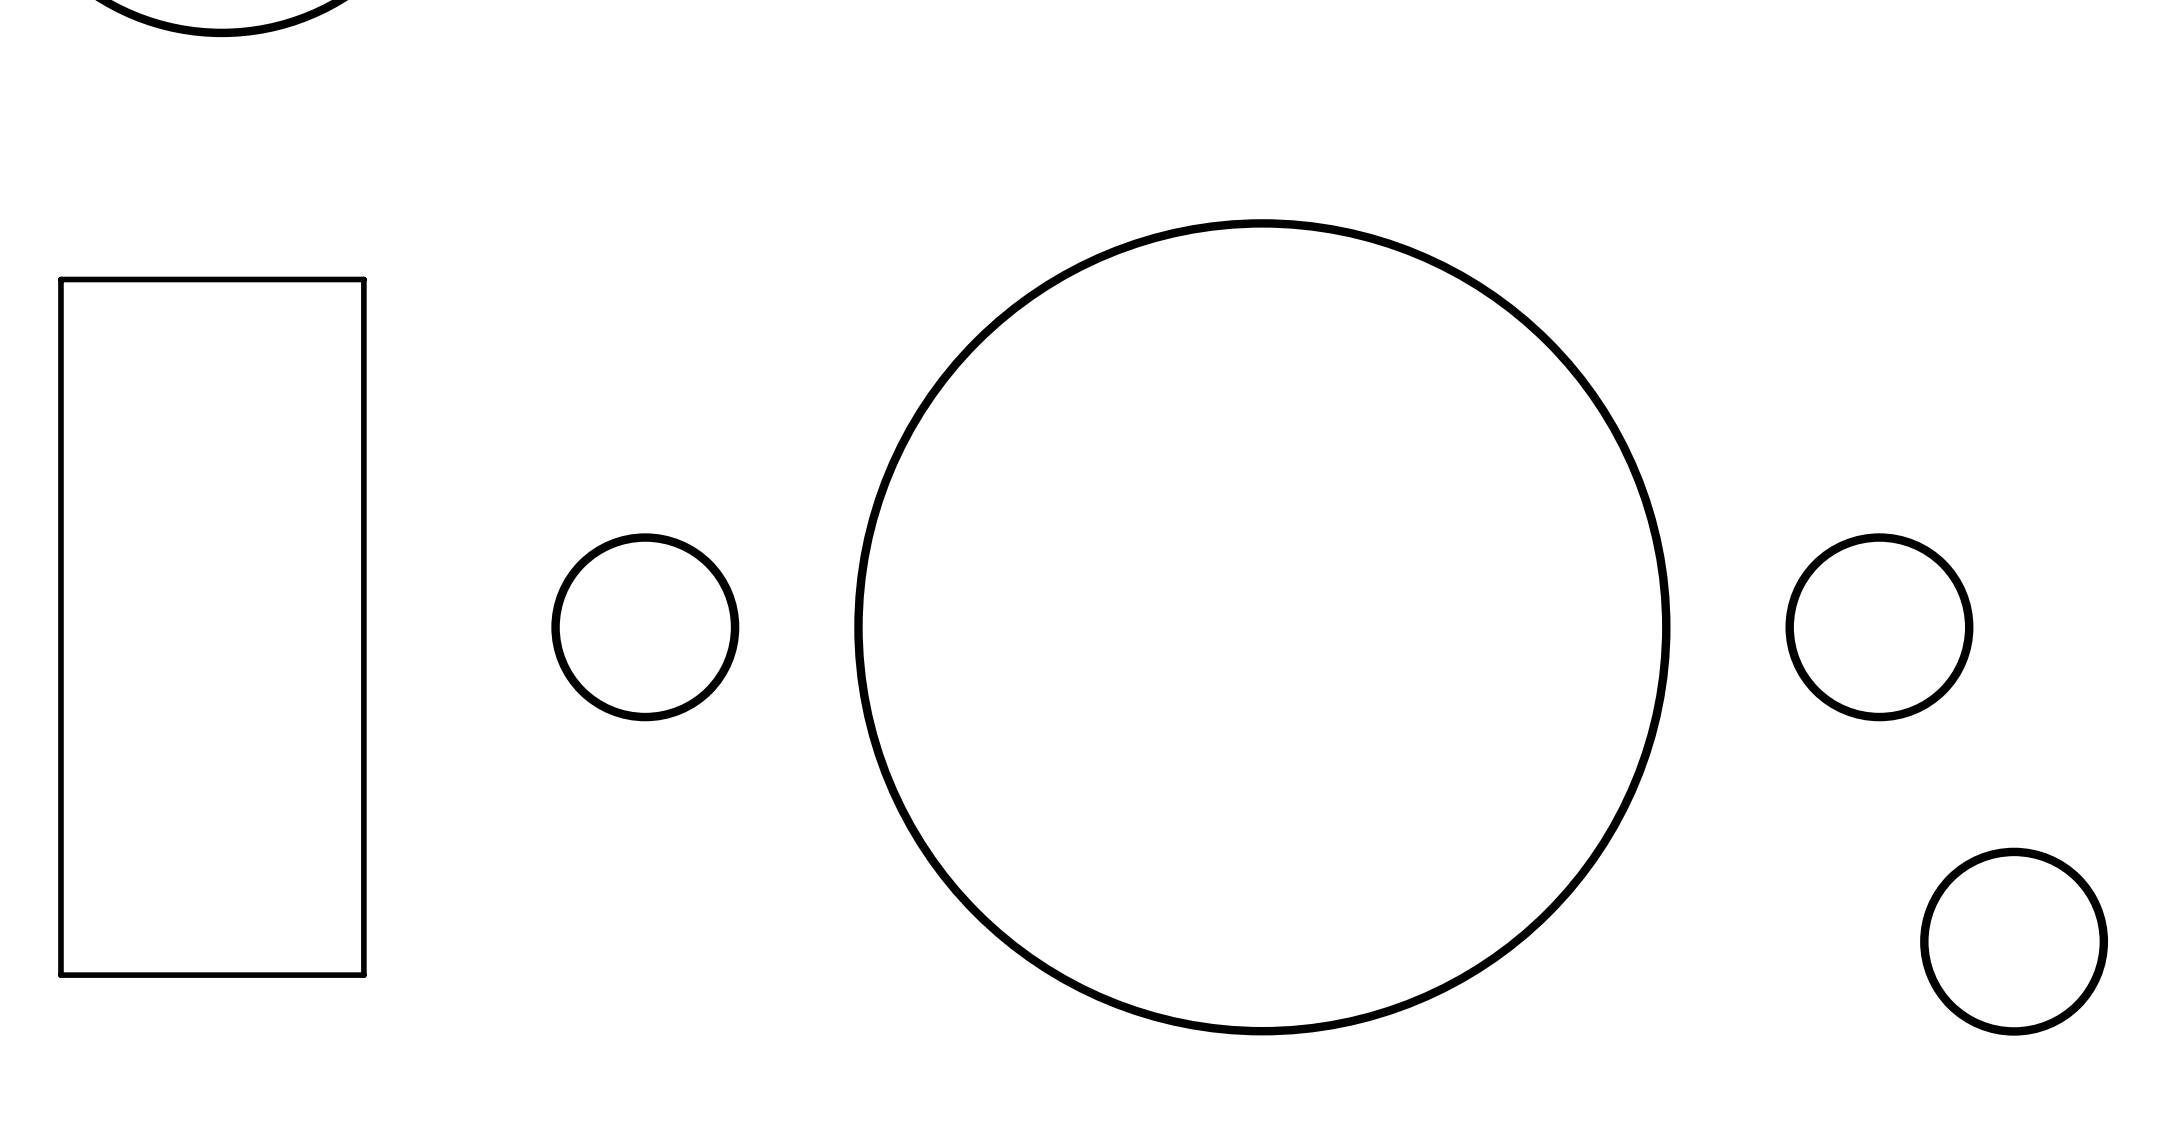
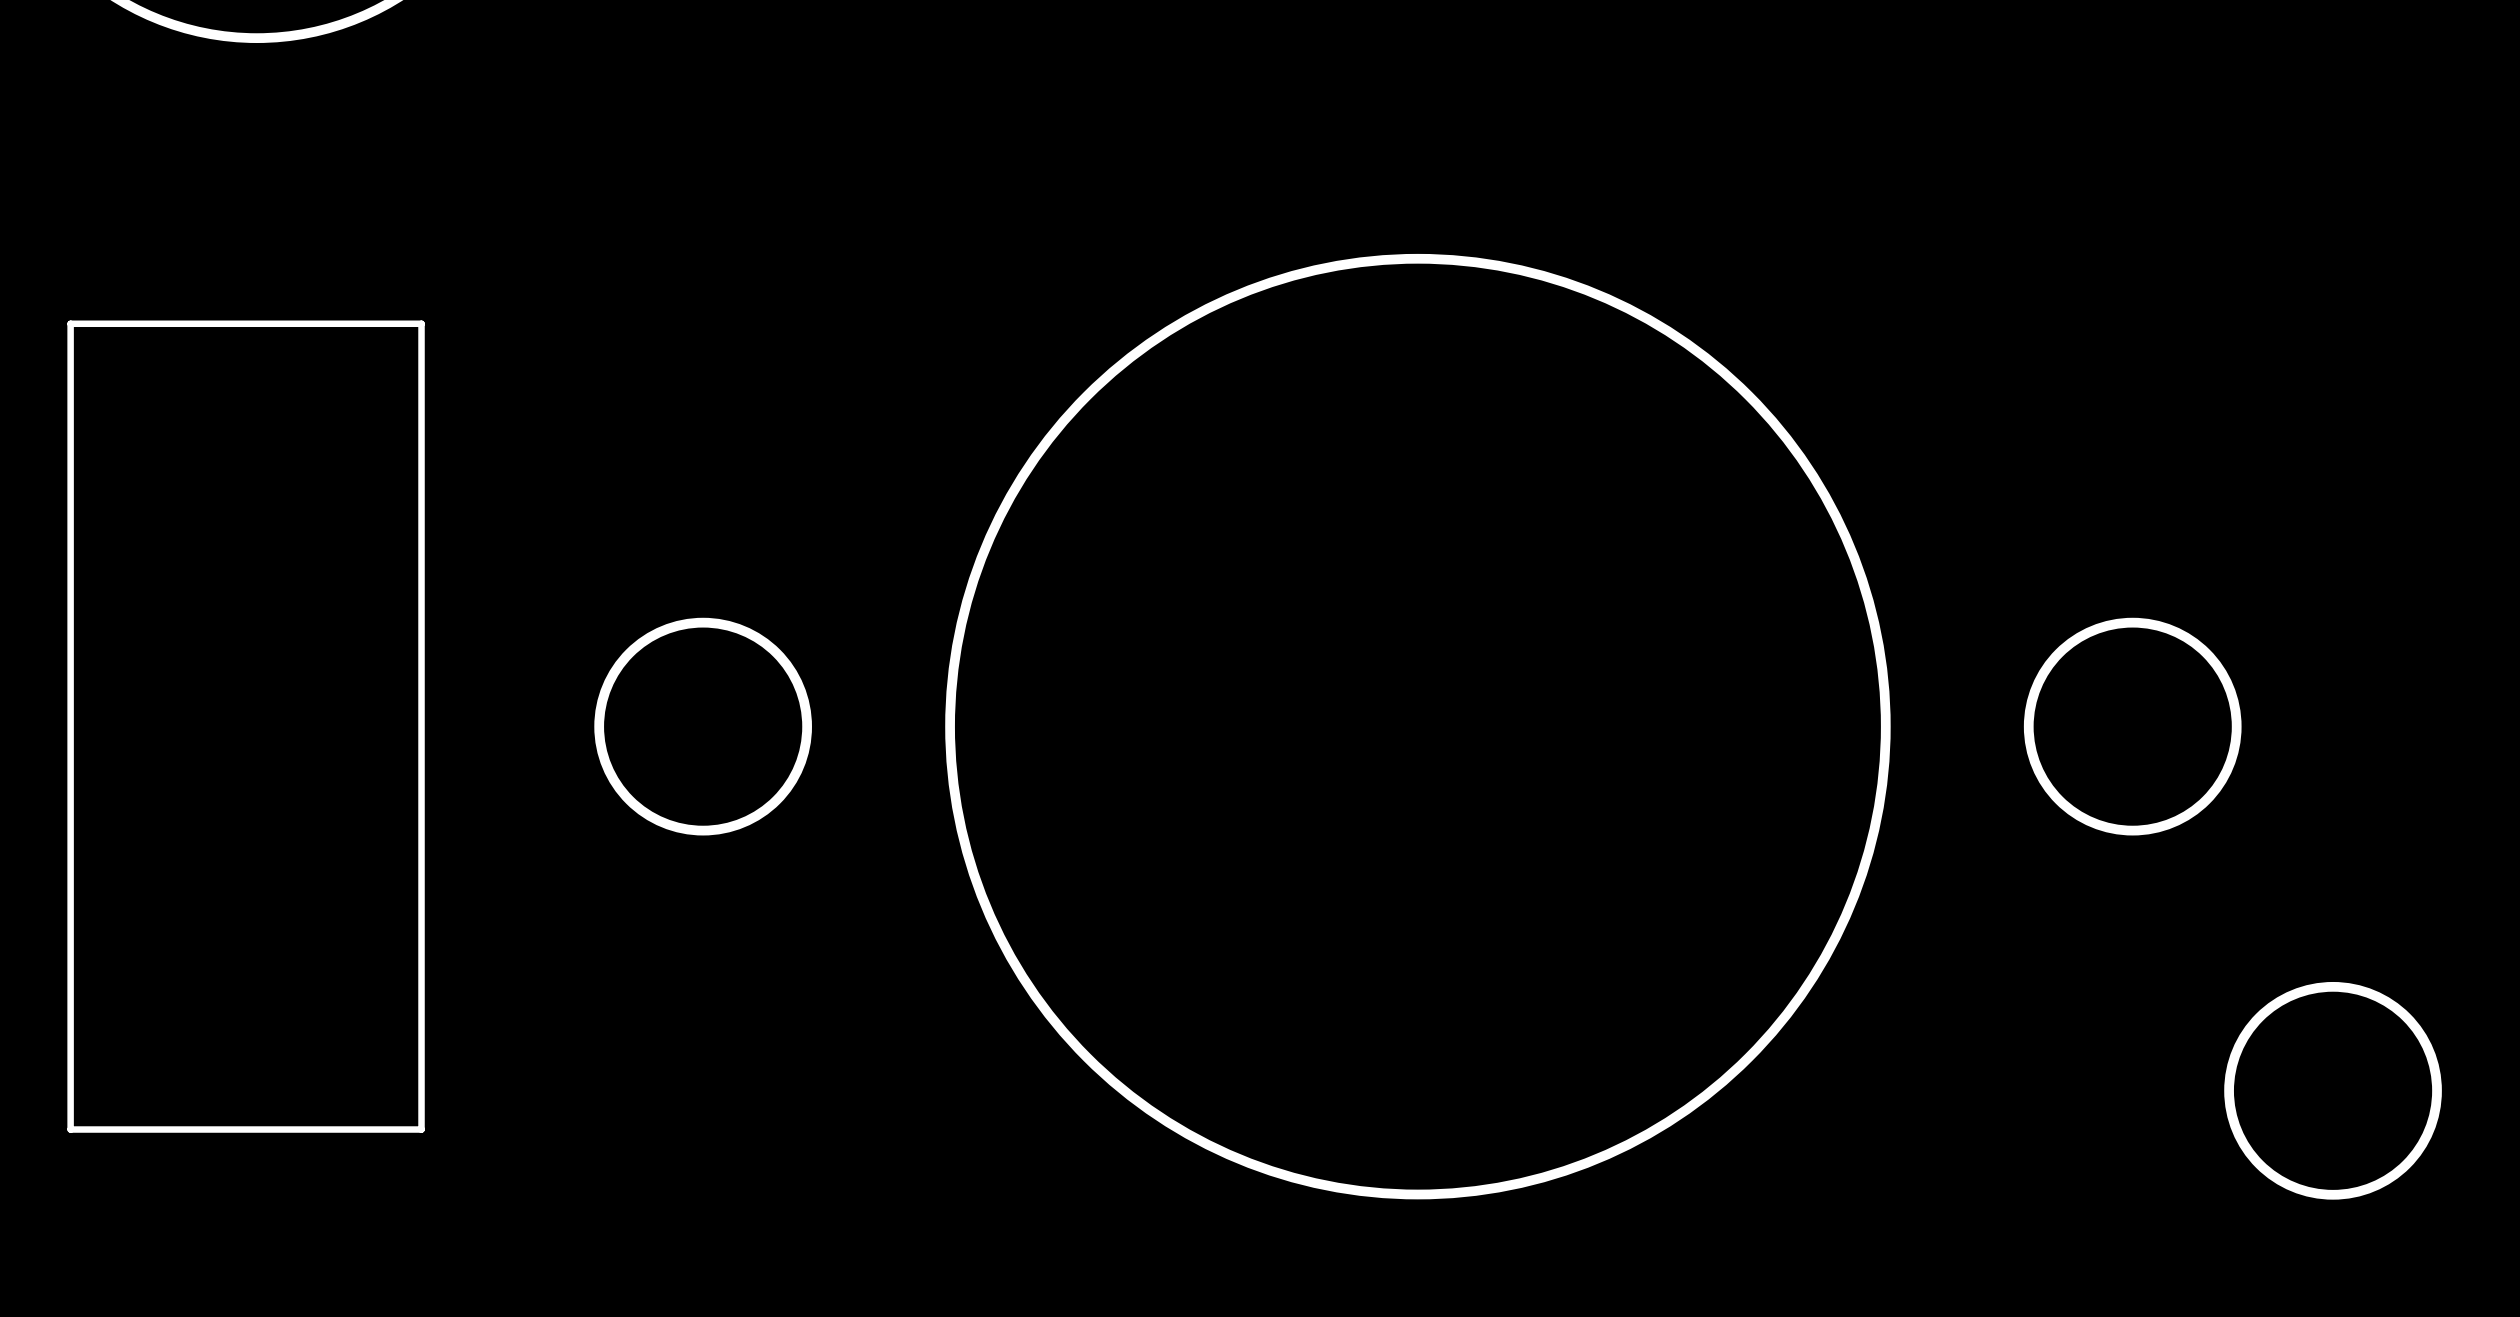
round board edge position: (645, 627) -> (703, 726)
round board edge position: (1262, 627) -> (1417, 726)
round board edge position: (1879, 627) -> (2132, 726)

